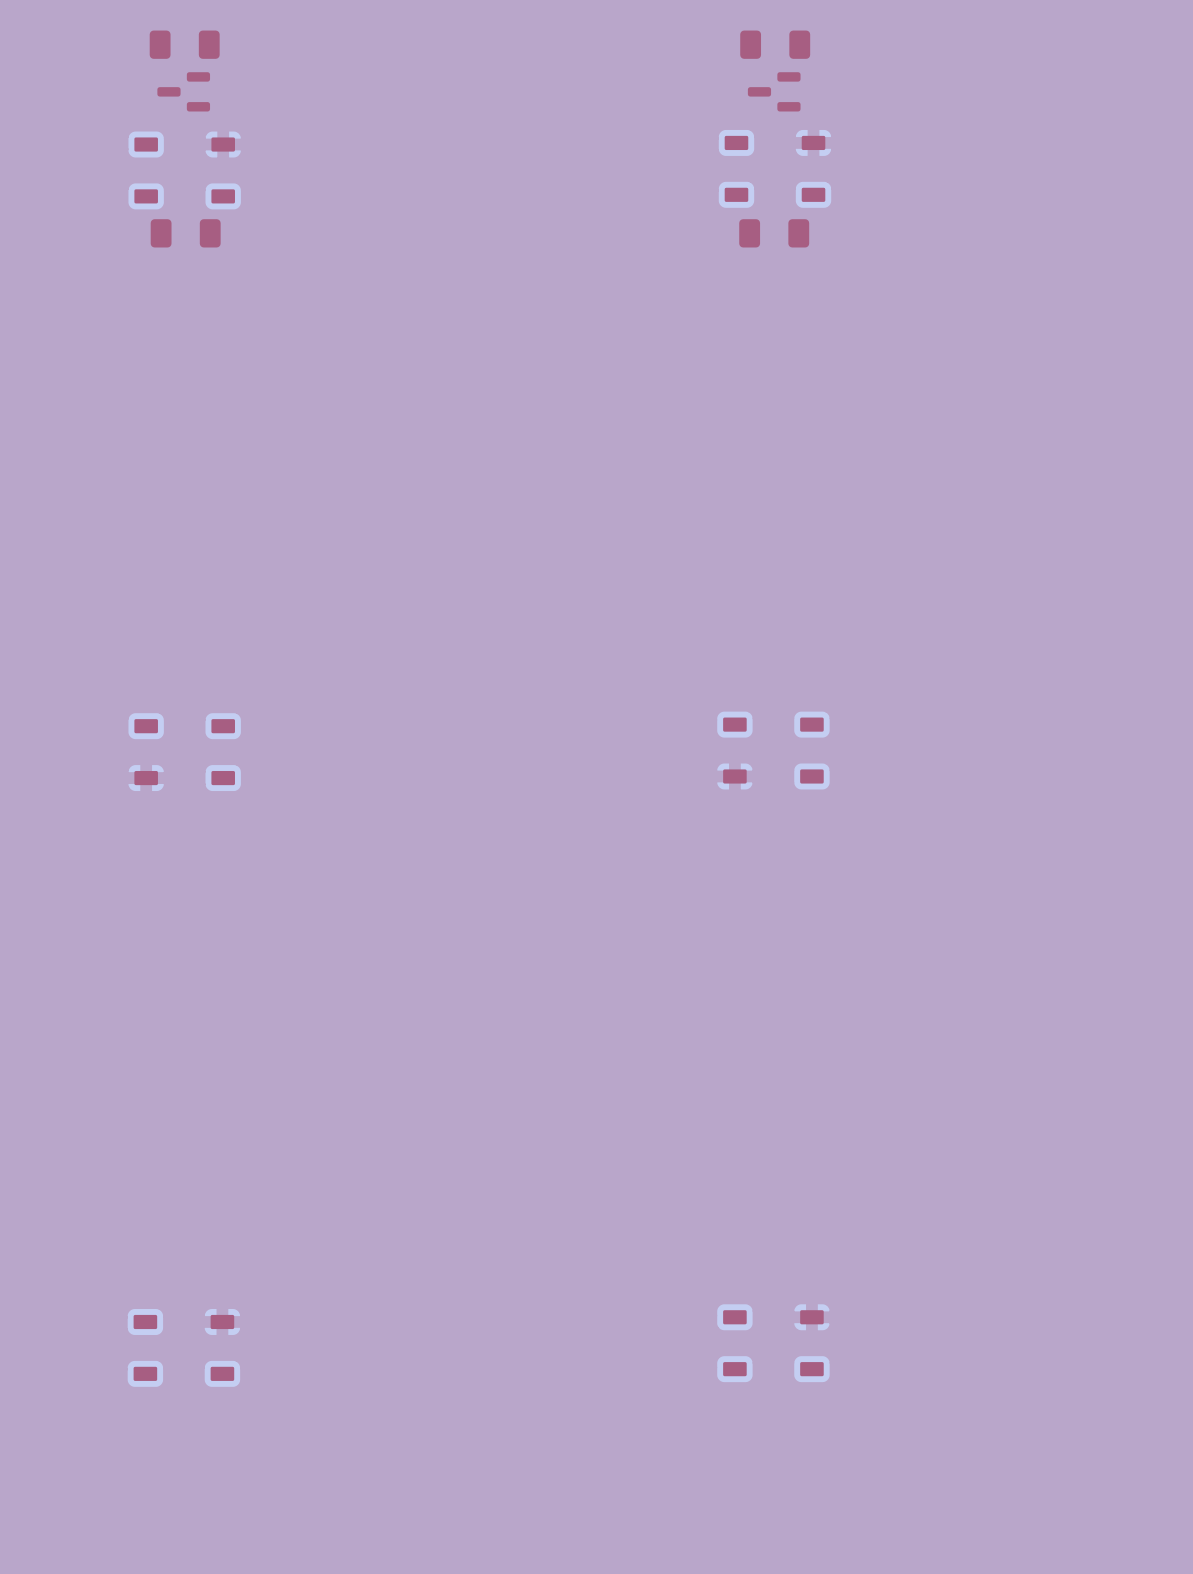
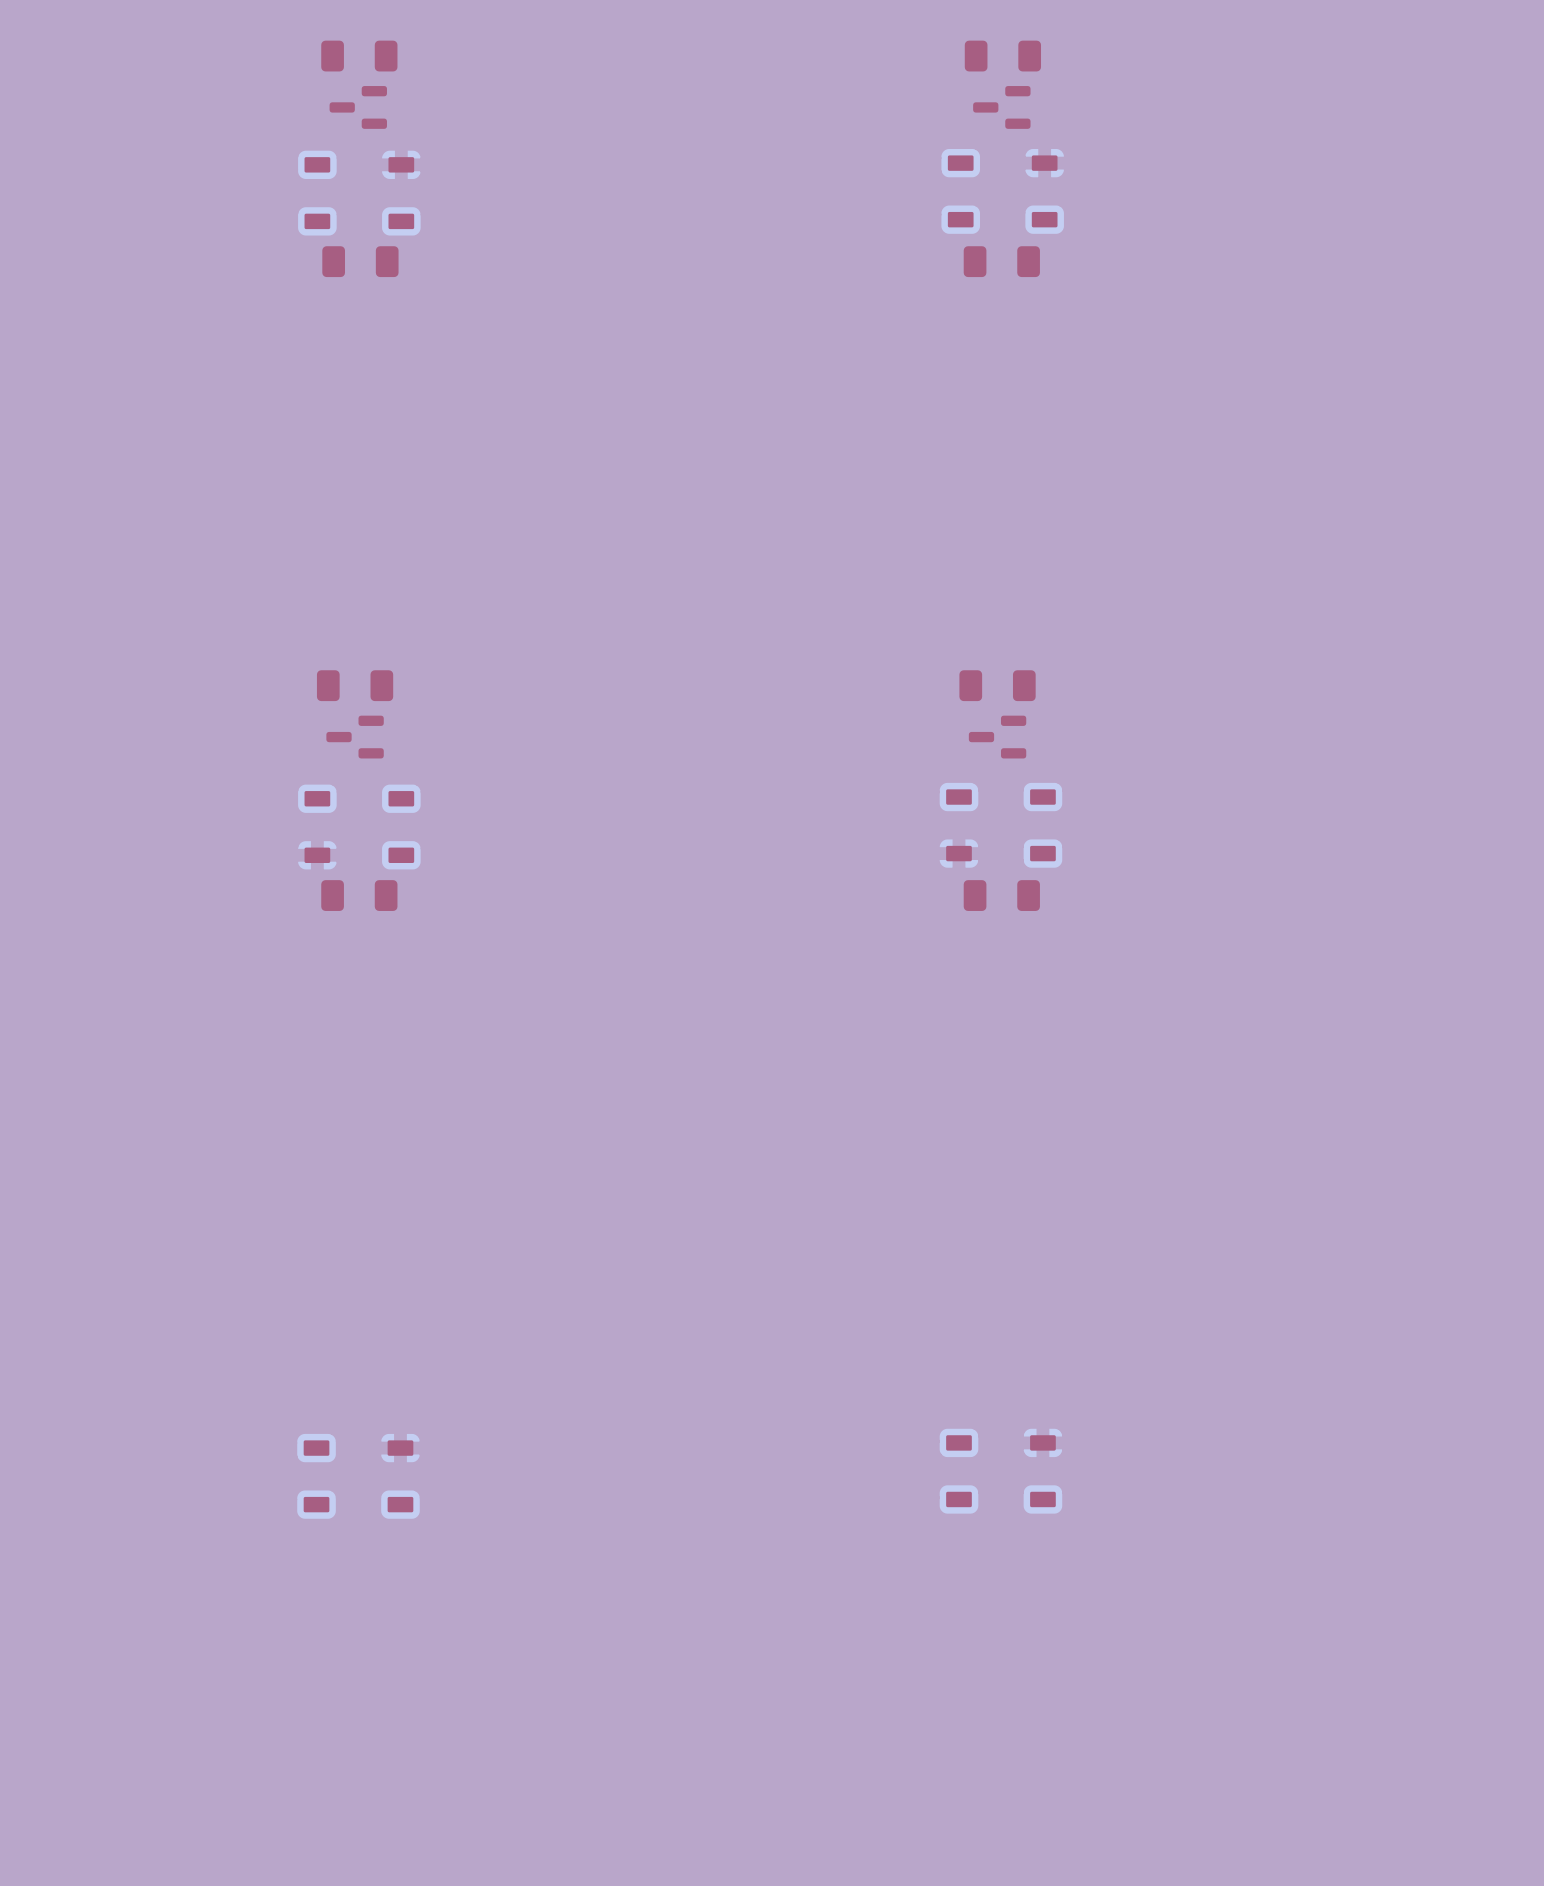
part: none -> (355, 685)
part: none -> (997, 685)
part: none -> (355, 737)
part: none -> (997, 737)
part: none -> (359, 895)
part: none -> (1001, 895)

